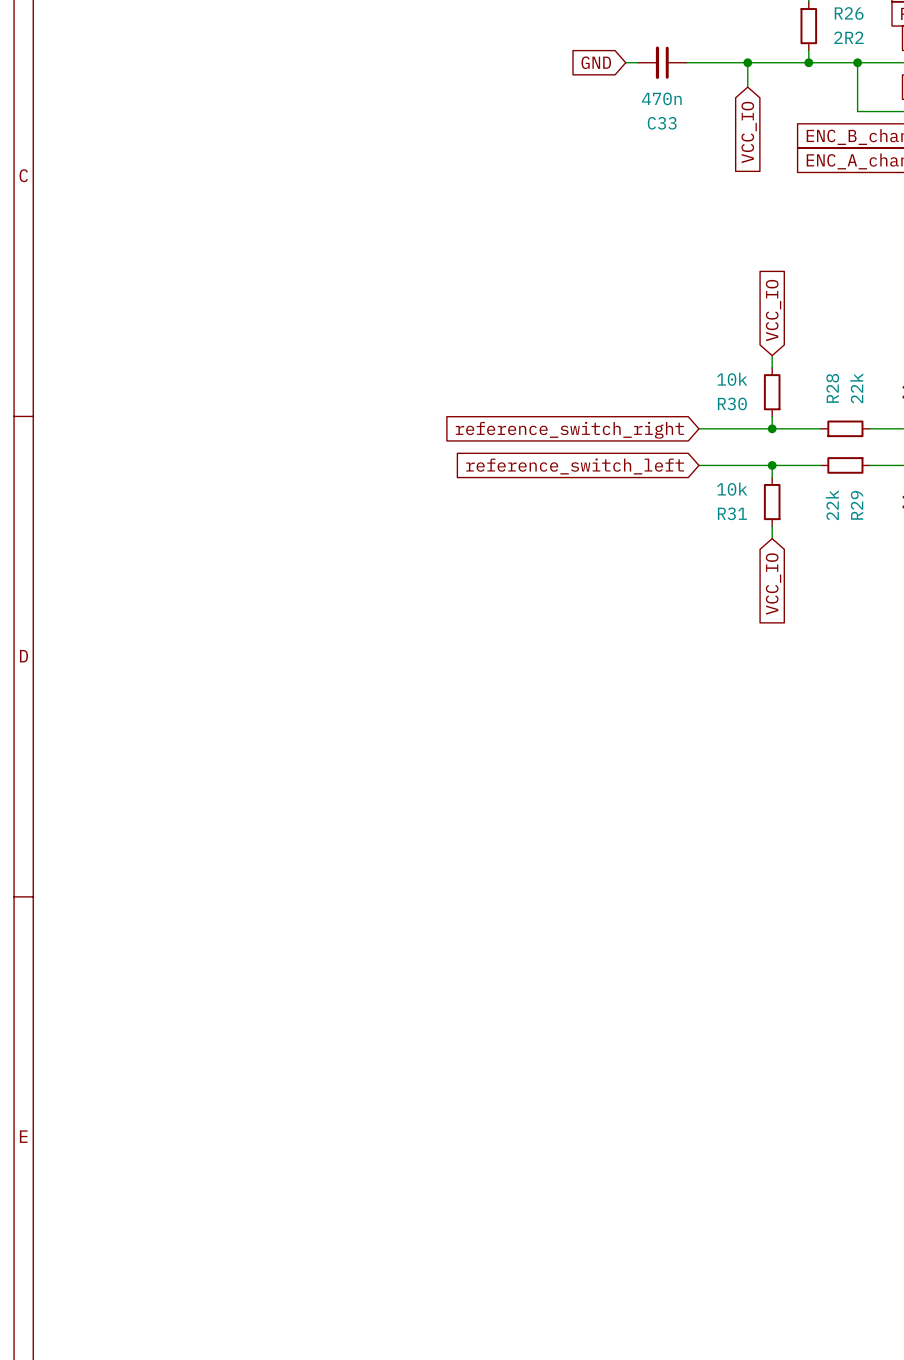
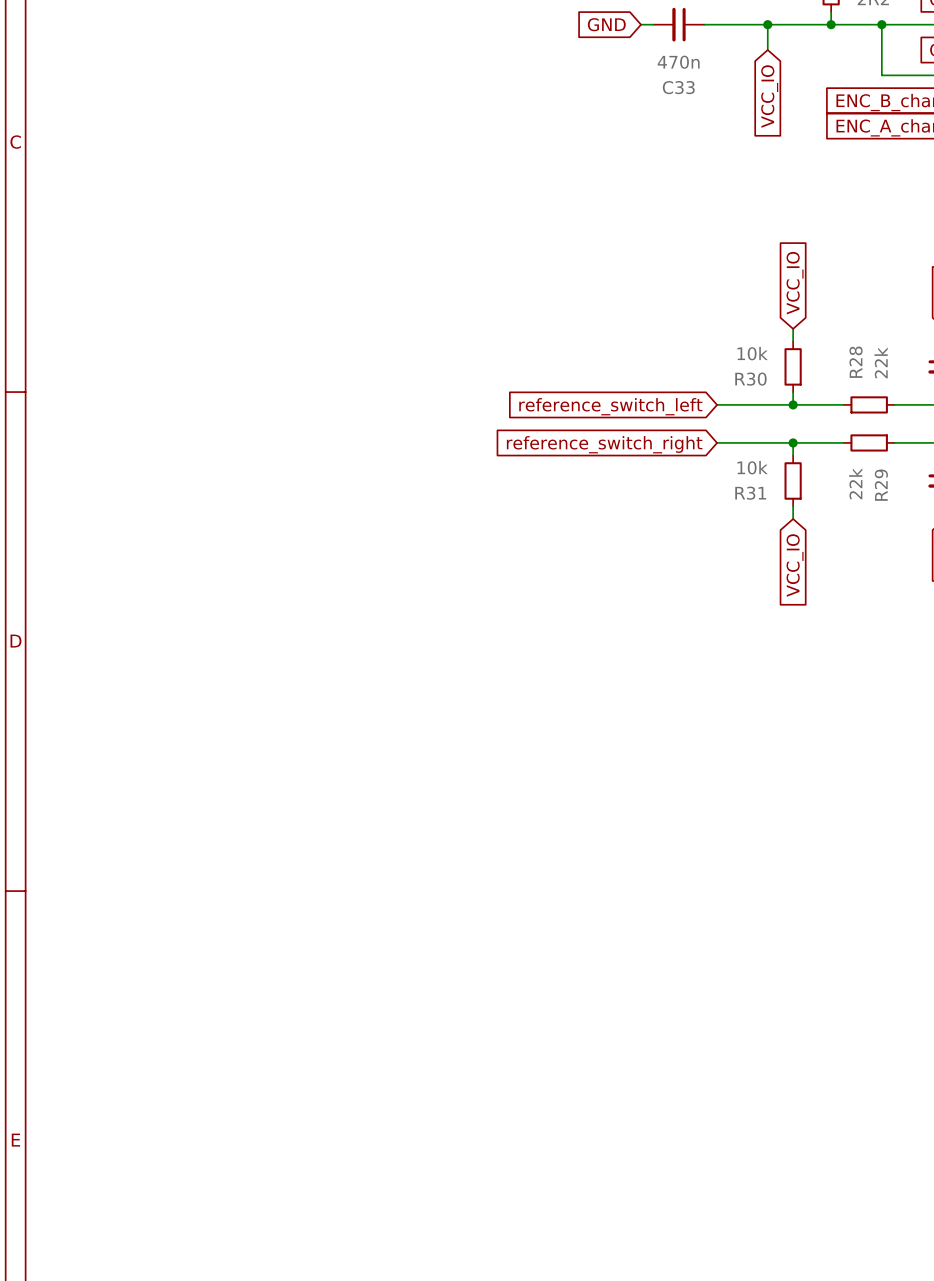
global label: reference_switch_right (569, 430) -> reference_switch_left (610, 406)
global label: reference_switch_left (575, 466) -> reference_switch_right (604, 444)

